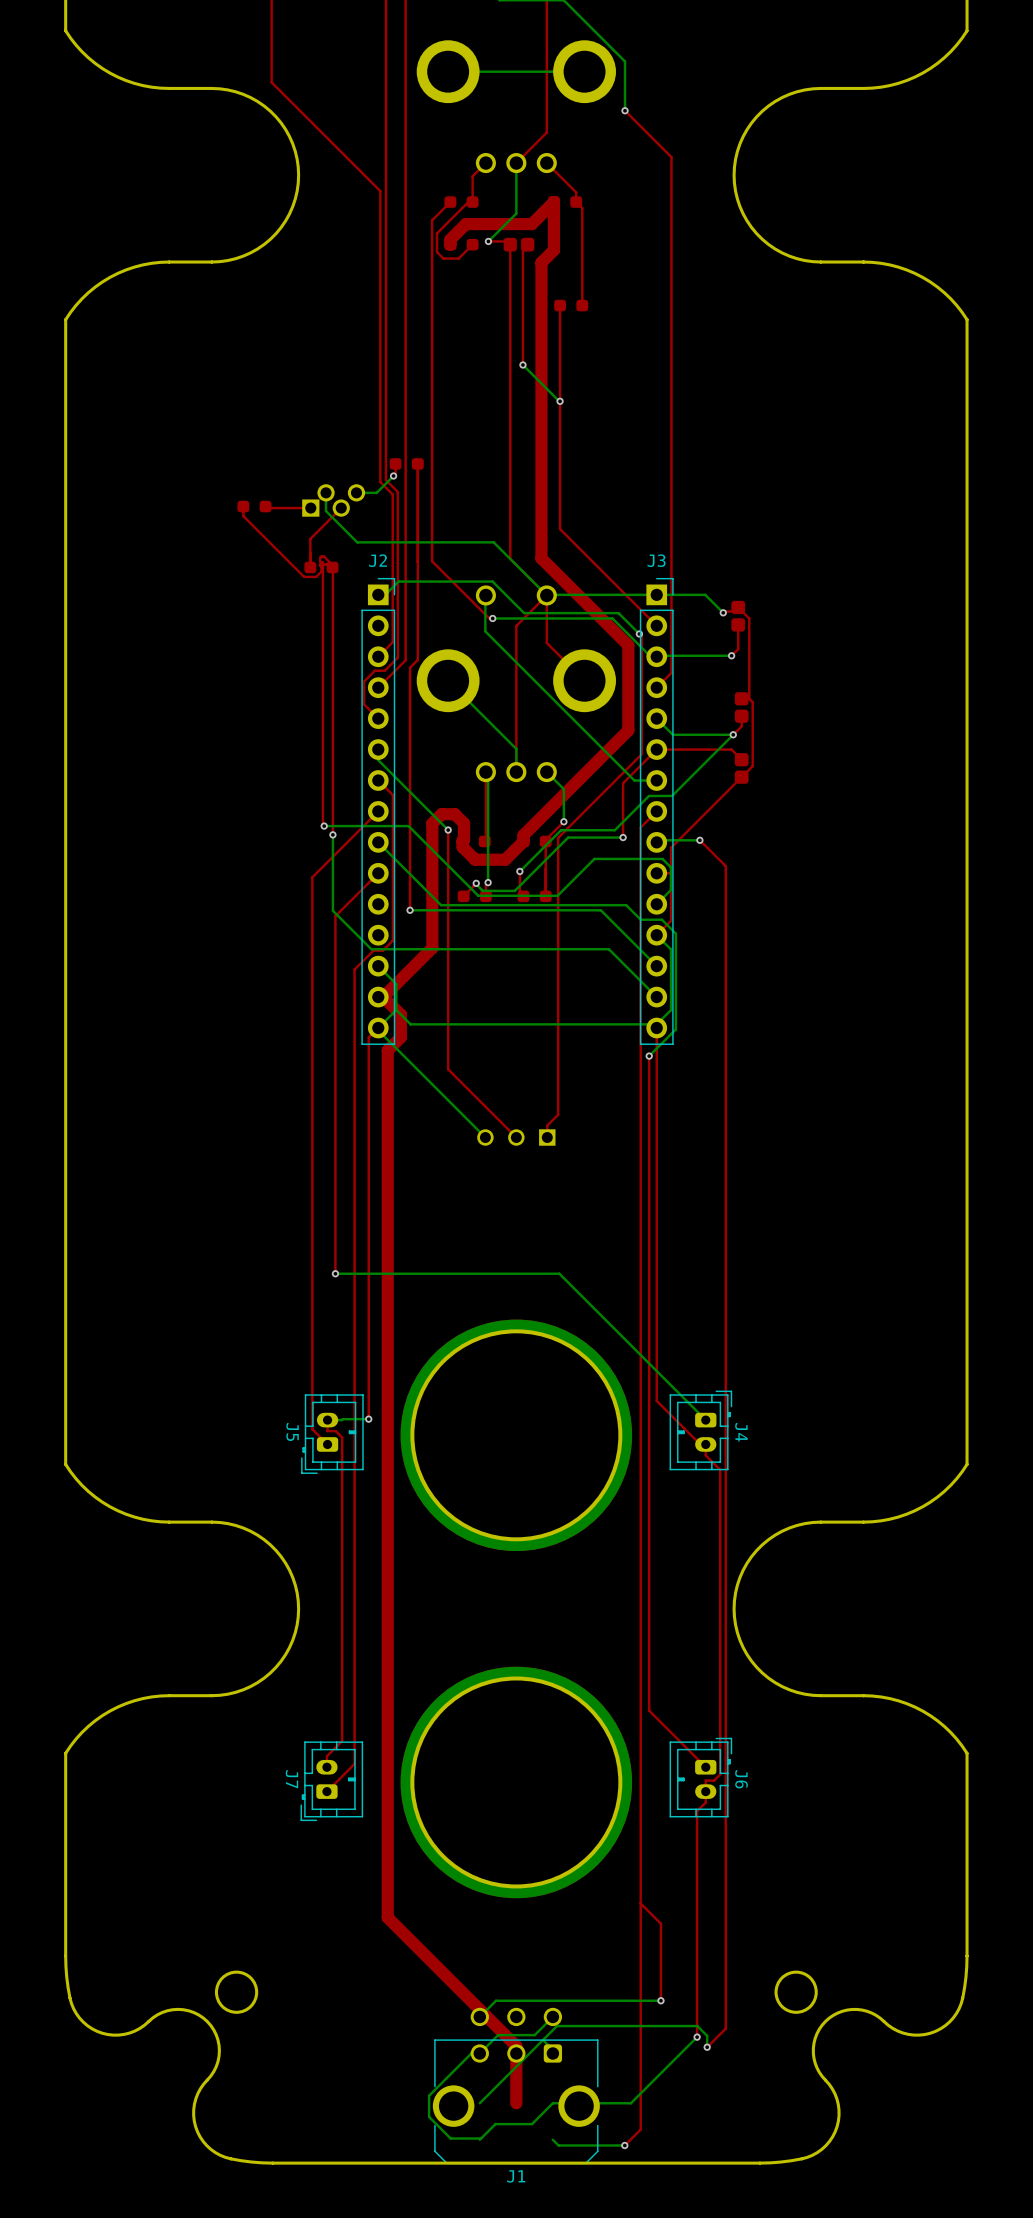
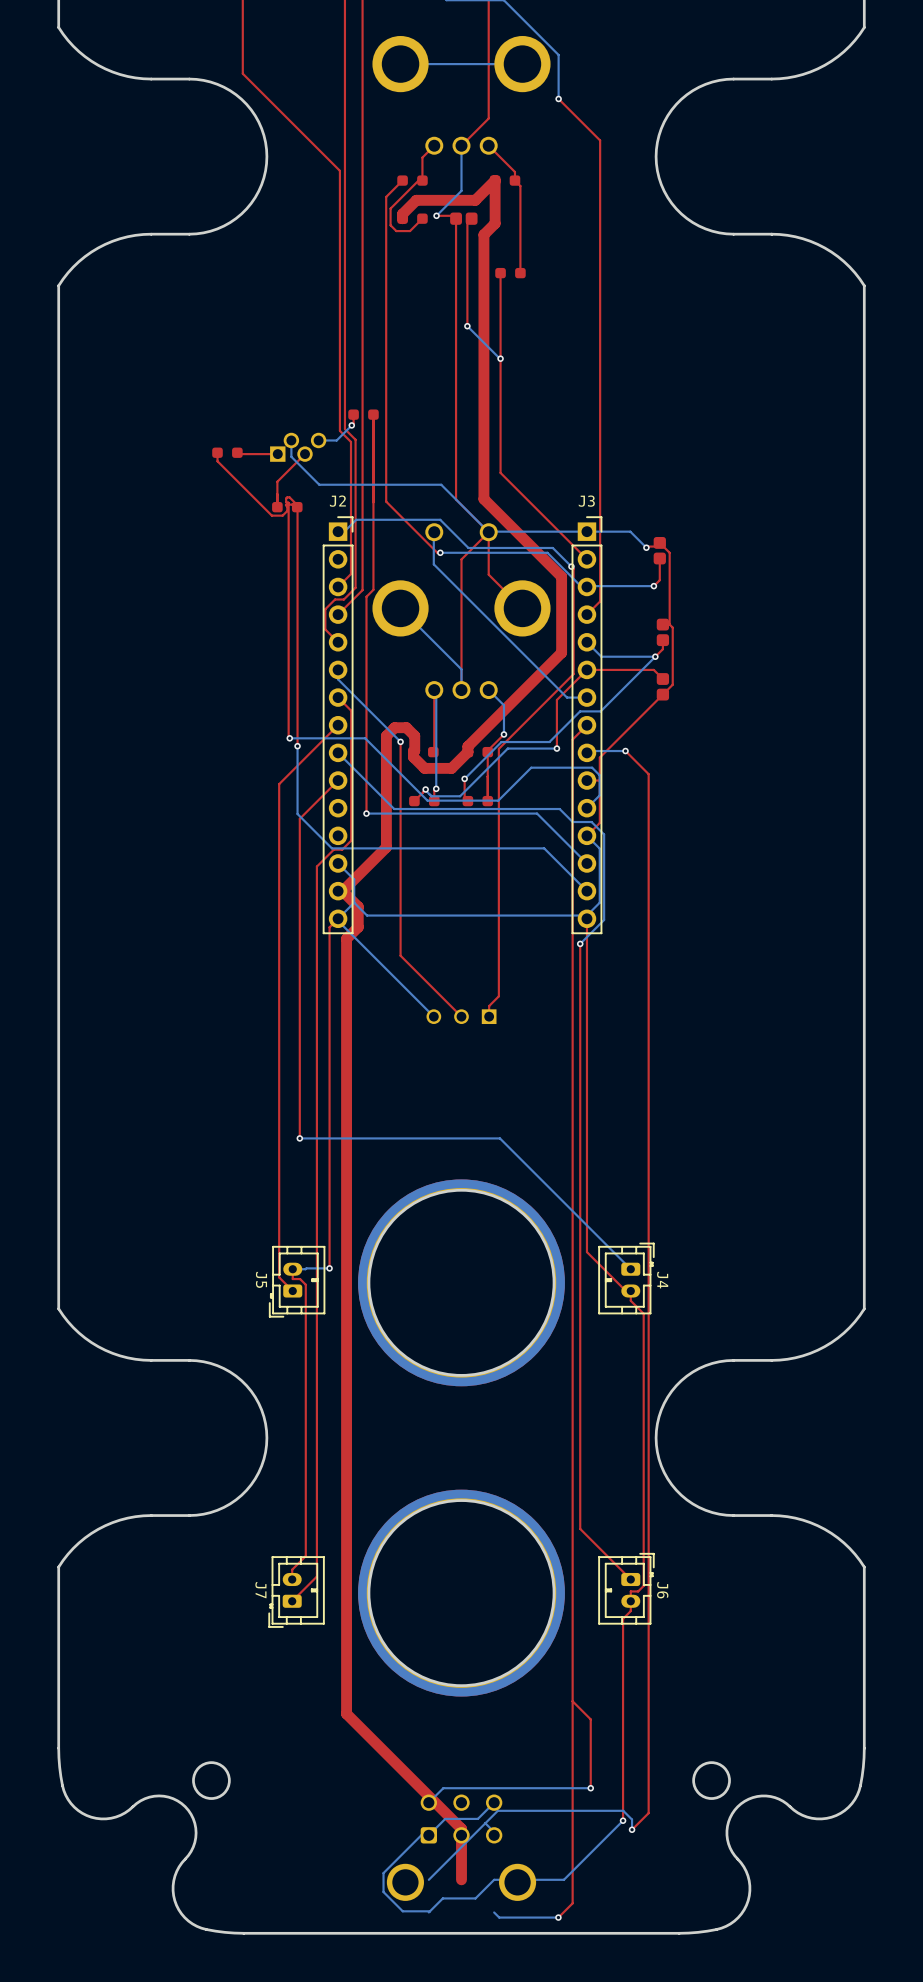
J1 side: bottom (516, 2086) -> top (461, 1847)

